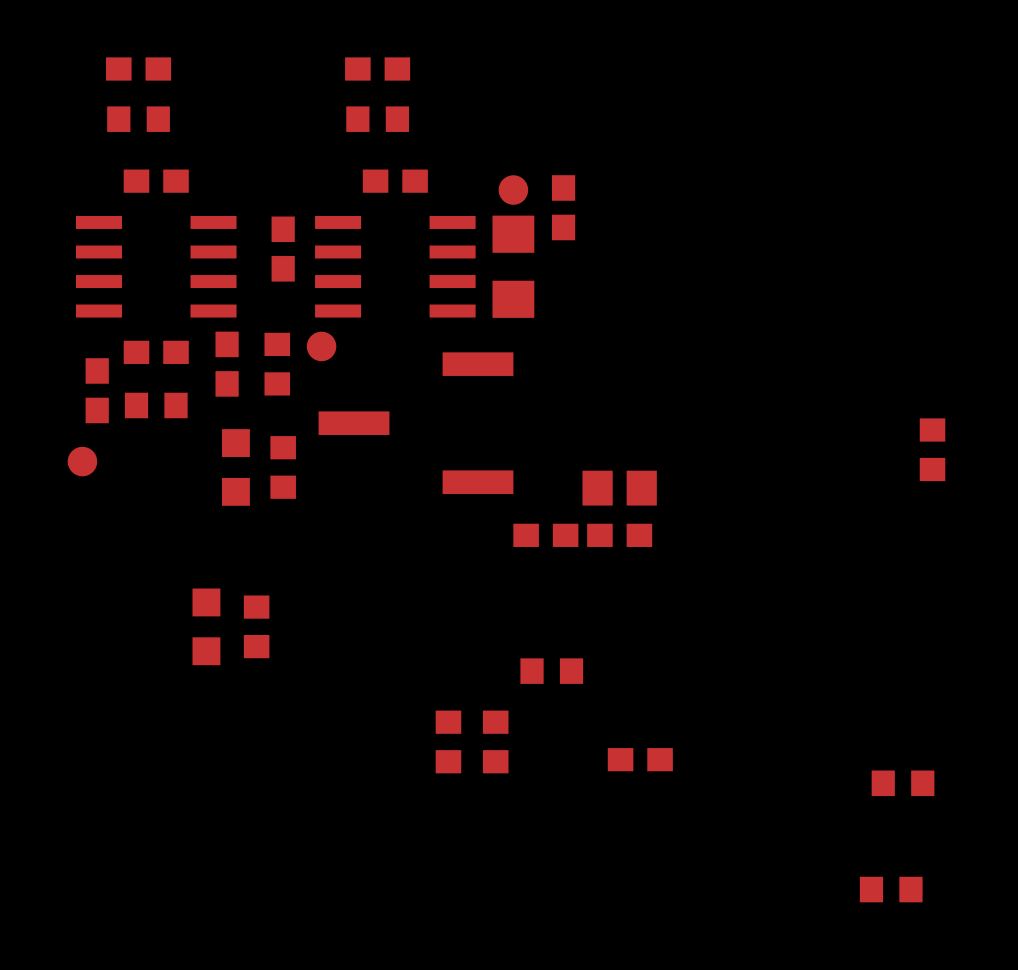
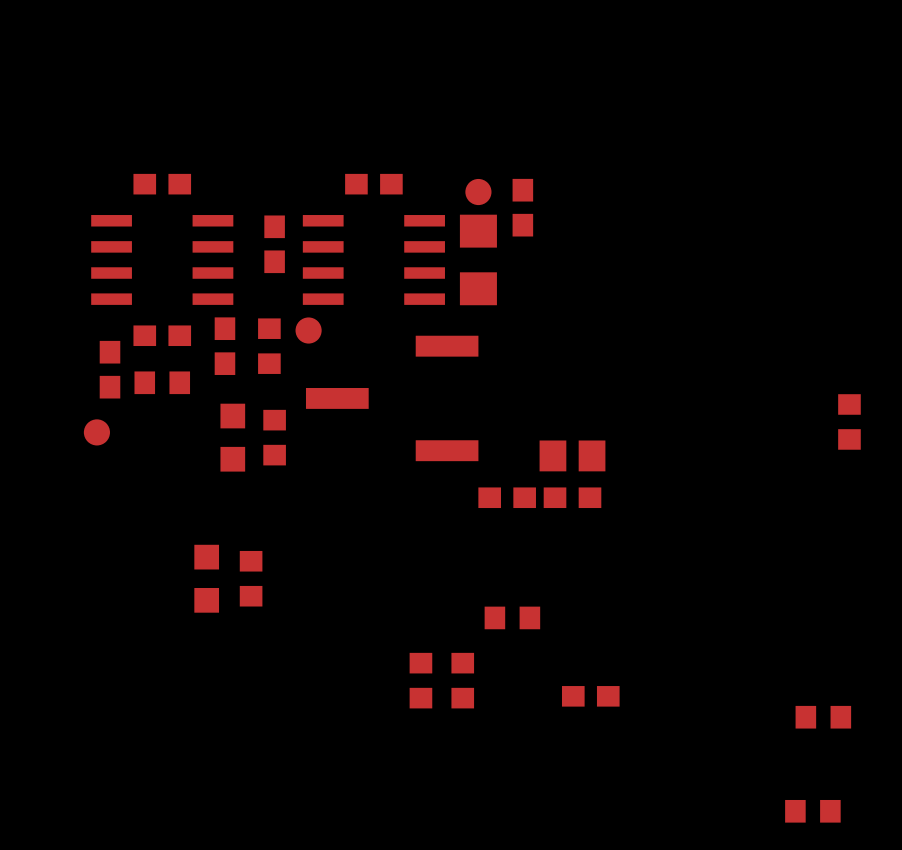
part: (138, 68) -> none
part: (377, 68) -> none
part: (138, 119) -> none
part: (377, 119) -> none

